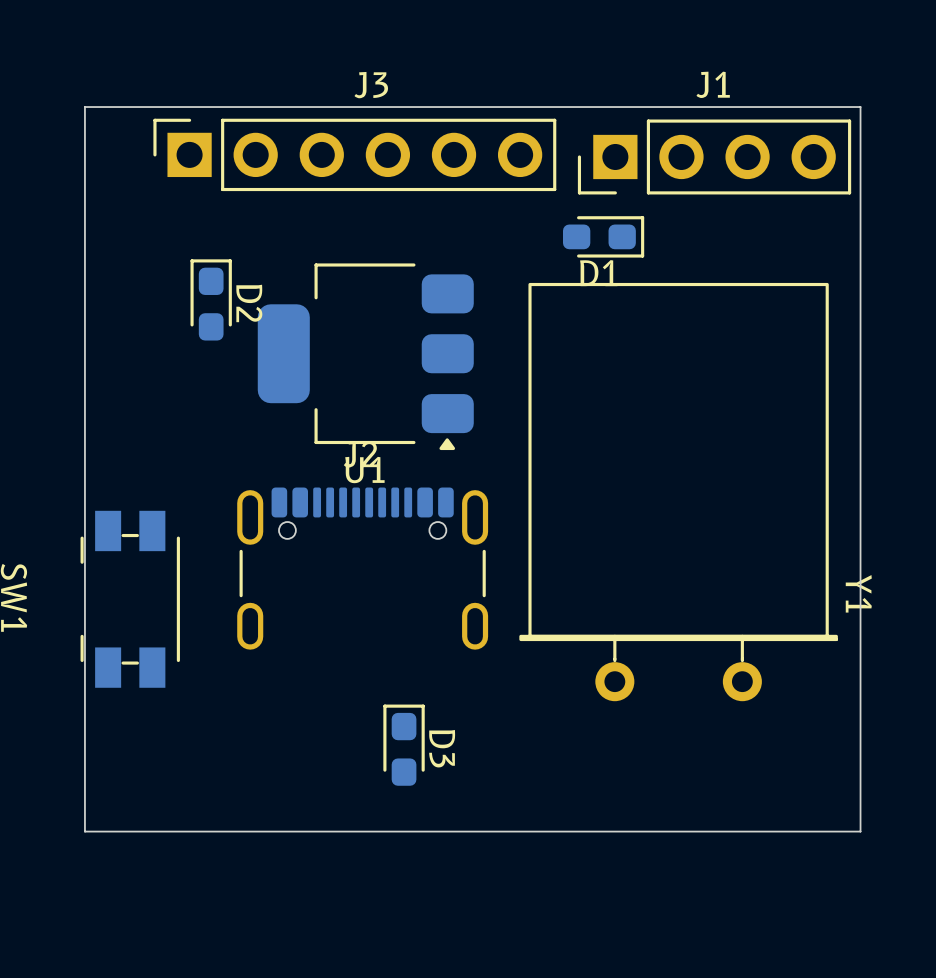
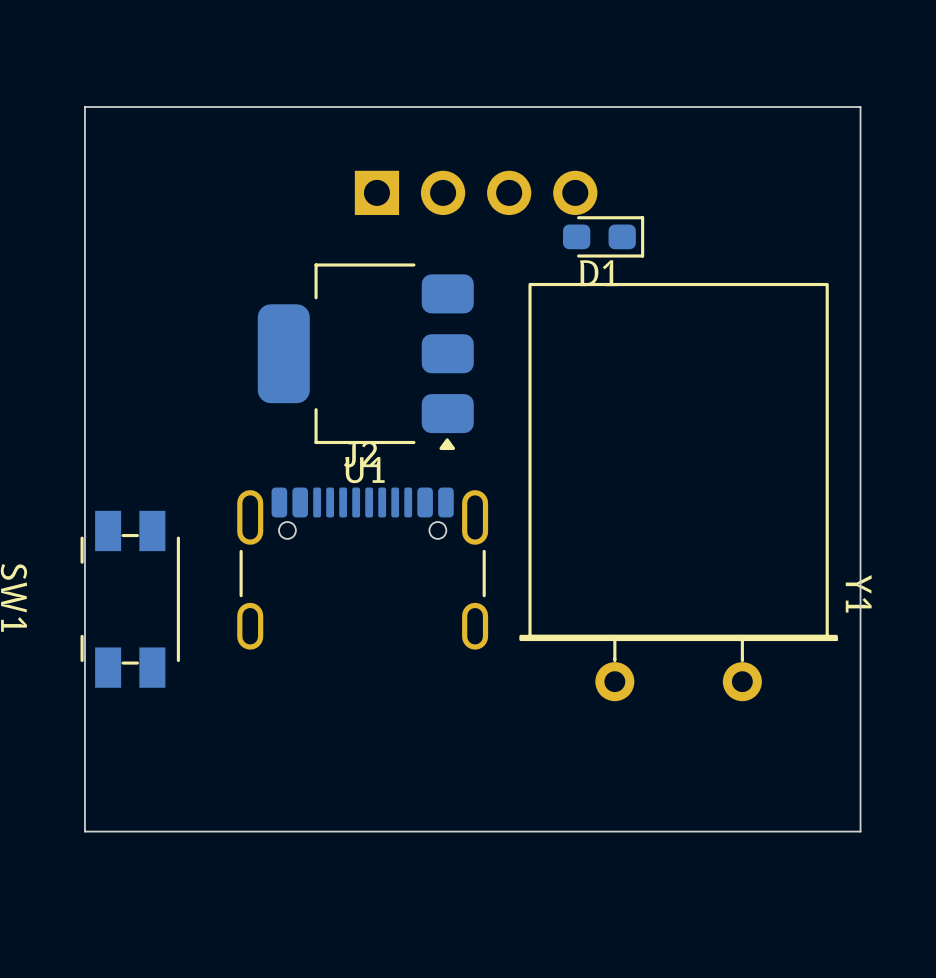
J3: (354, 154) -> none
J1 side: bottom (714, 156) -> top (476, 192)
D2: (211, 299) -> none
D3: (404, 745) -> none

